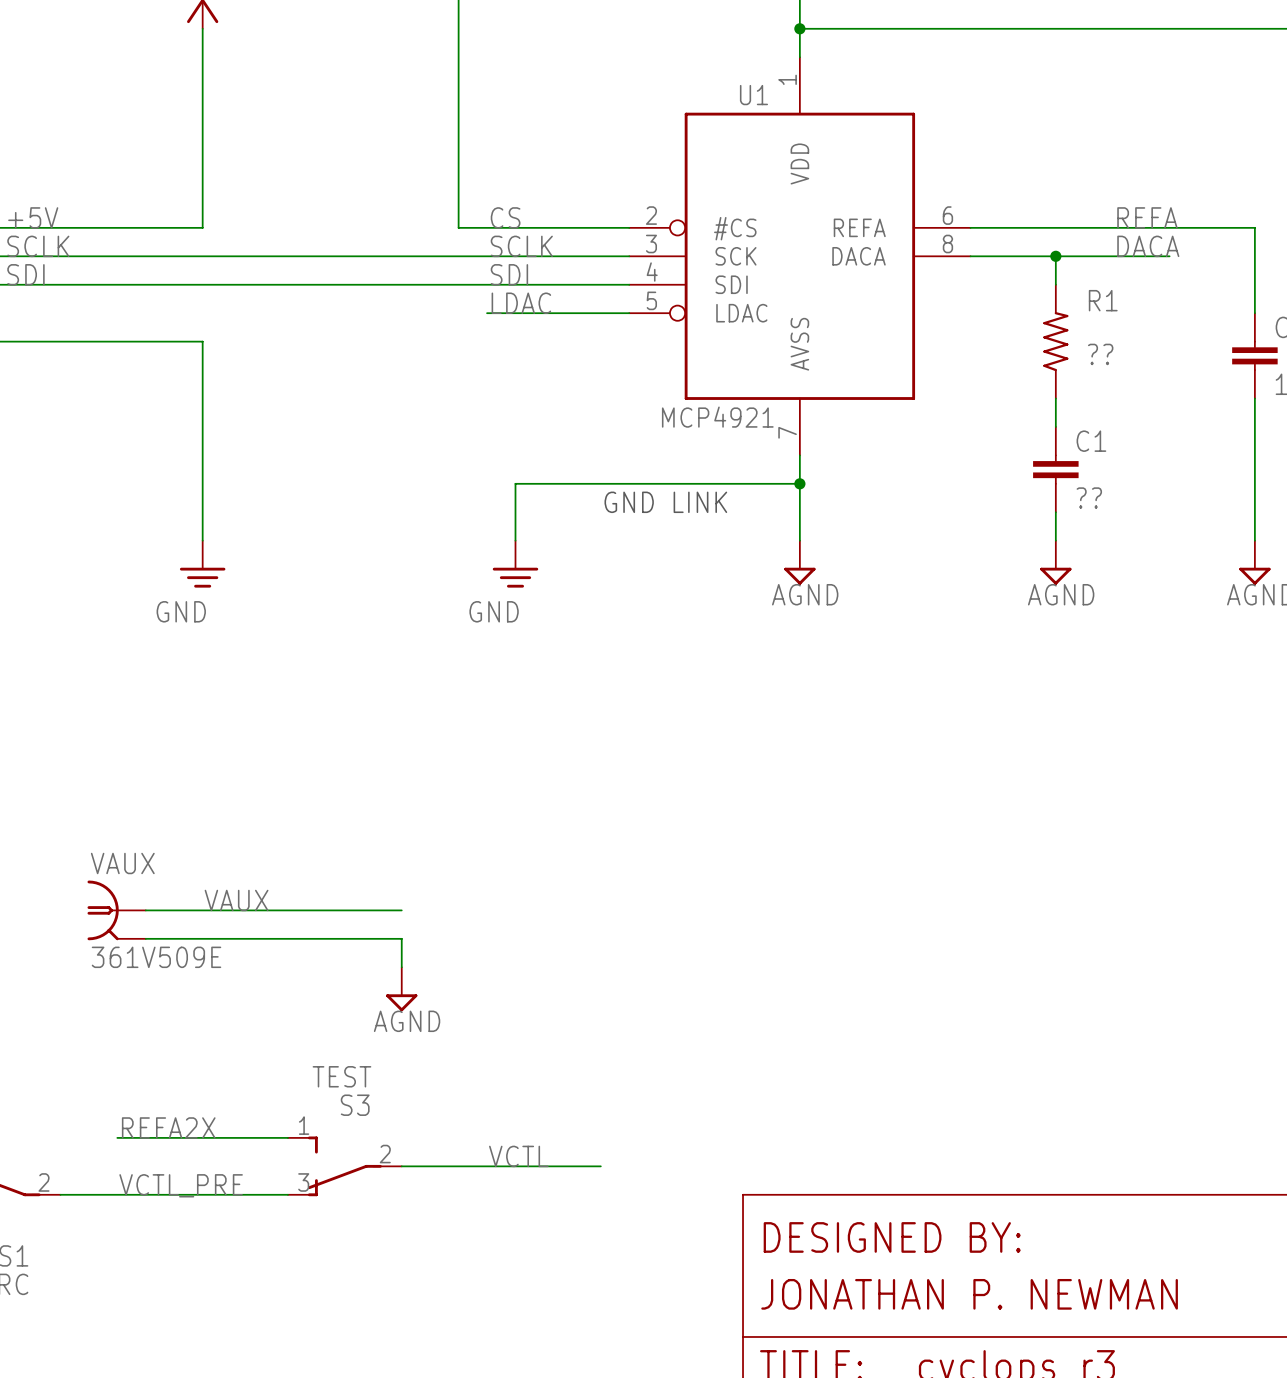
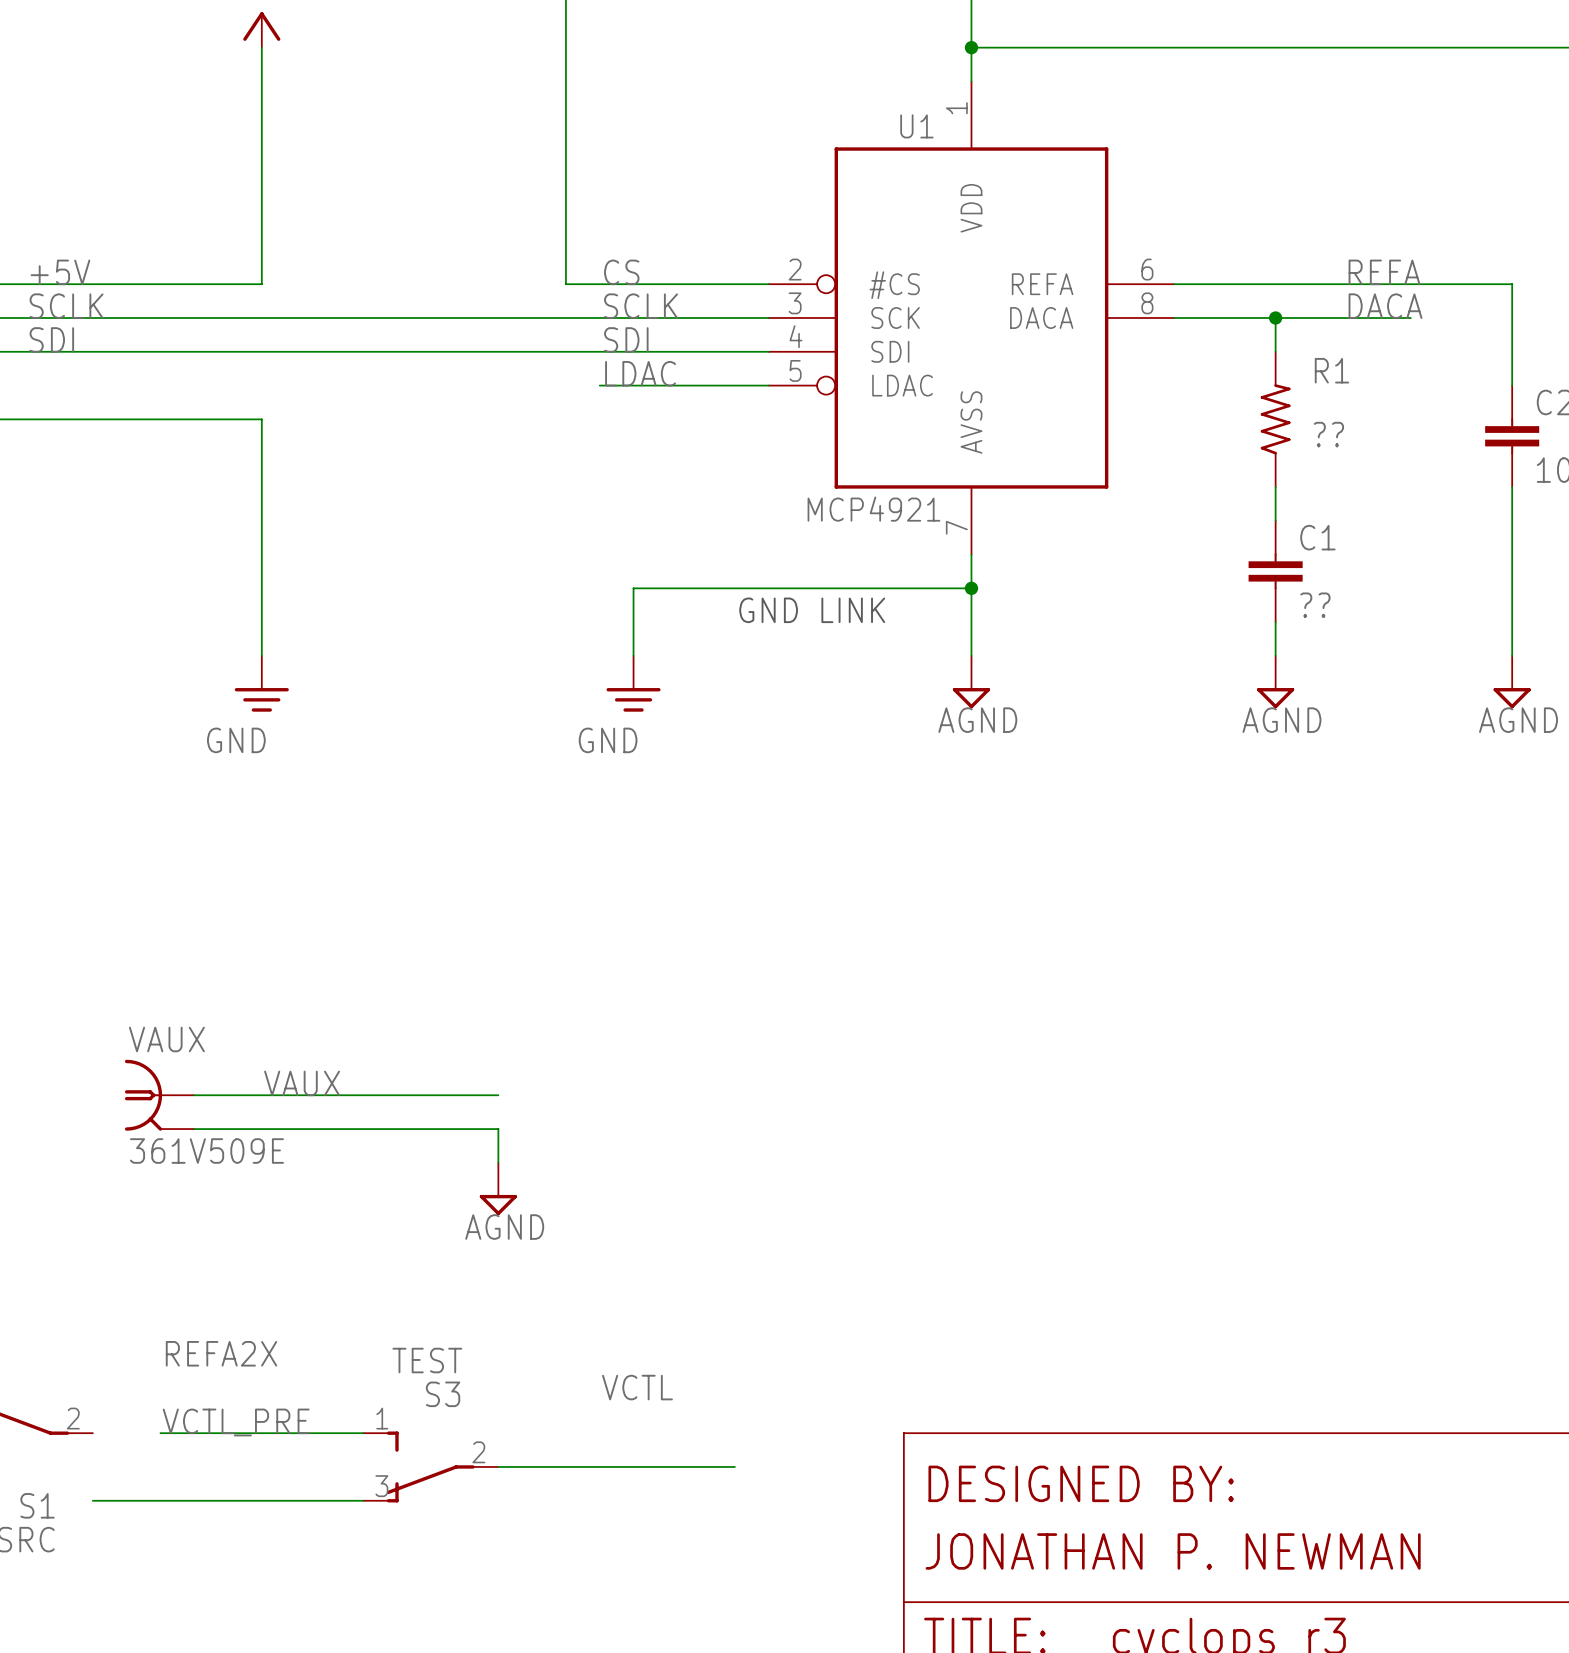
wire: (117, 1137) (287, 1137) -> none
S3 position: (344, 1166) -> (430, 1466)
wire: (401, 1166) (600, 1166) -> (498, 1466) (734, 1466)
wire: (60, 1194) (117, 1194) -> none
wire: none -> (92, 1500) (363, 1500)

